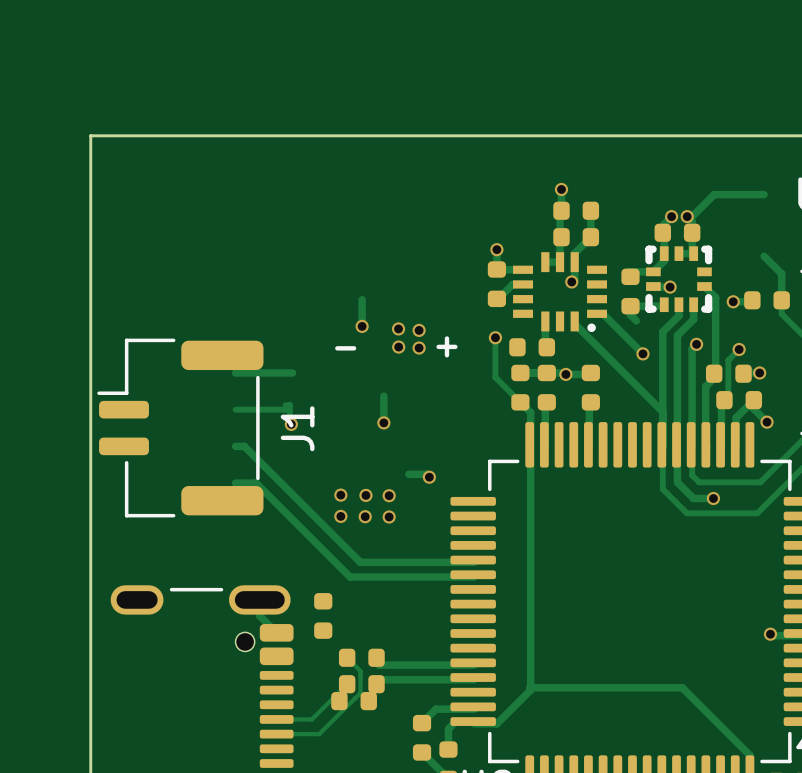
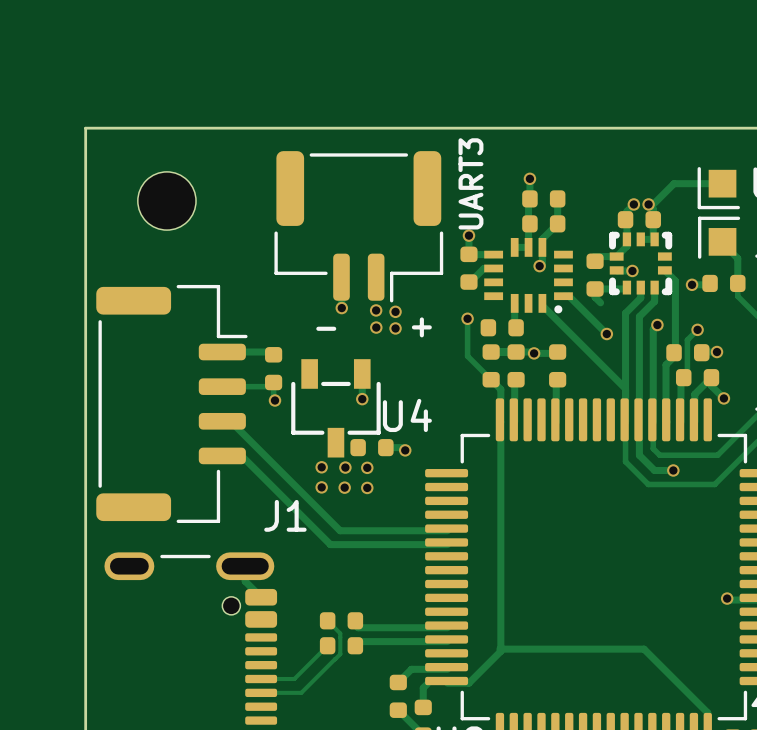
part: none -> (718, 188)
part: none -> (166, 200)
UART3: none -> (358, 226)
part: none -> (719, 237)
J1 footprint: [97, 338, 264, 518] -> [96, 284, 248, 523]
part: none -> (273, 368)
J1 name position: J1 (297, 428) -> J1 (285, 515)
U4: none -> (335, 408)
part: none -> (371, 447)
part: (323, 615) -> none
part: (354, 701) -> none

